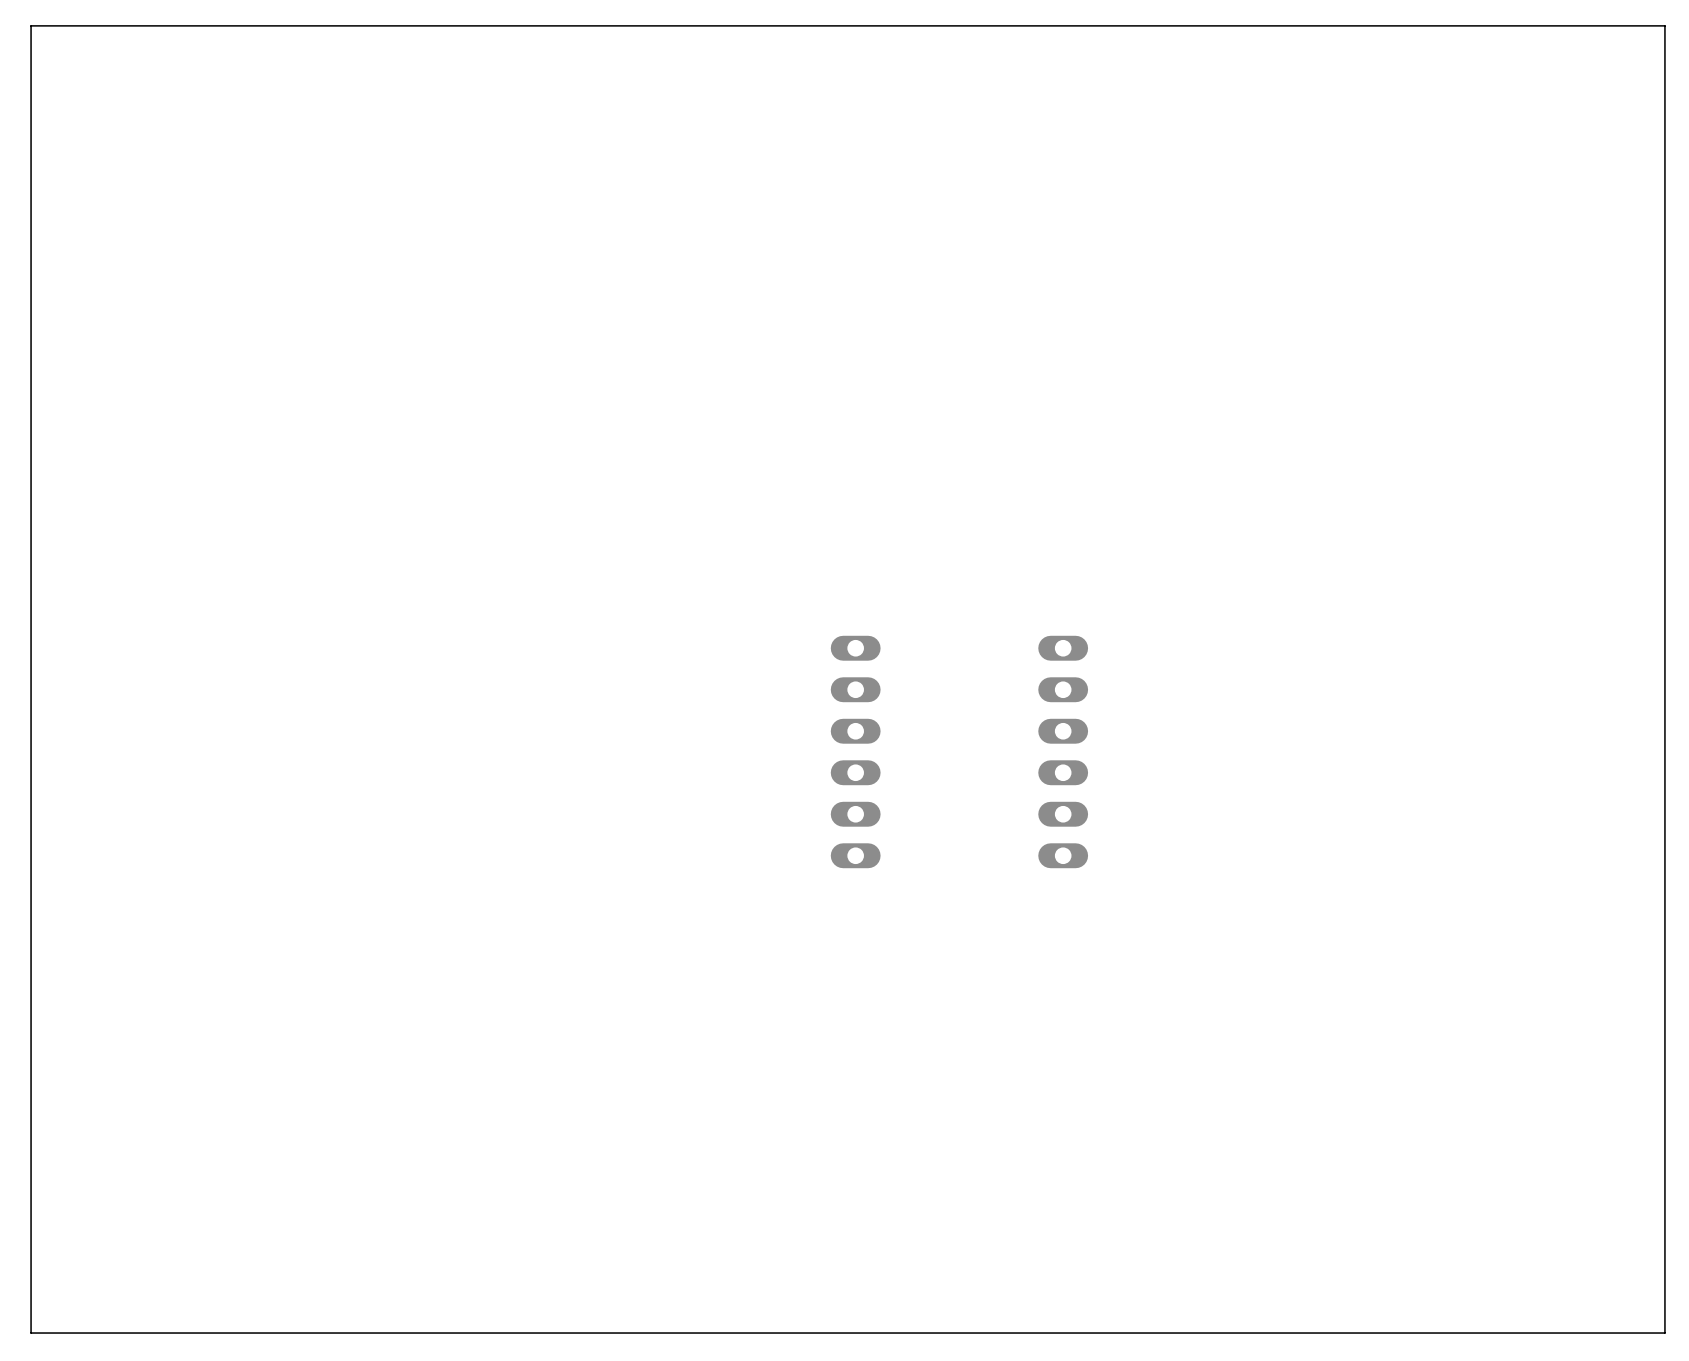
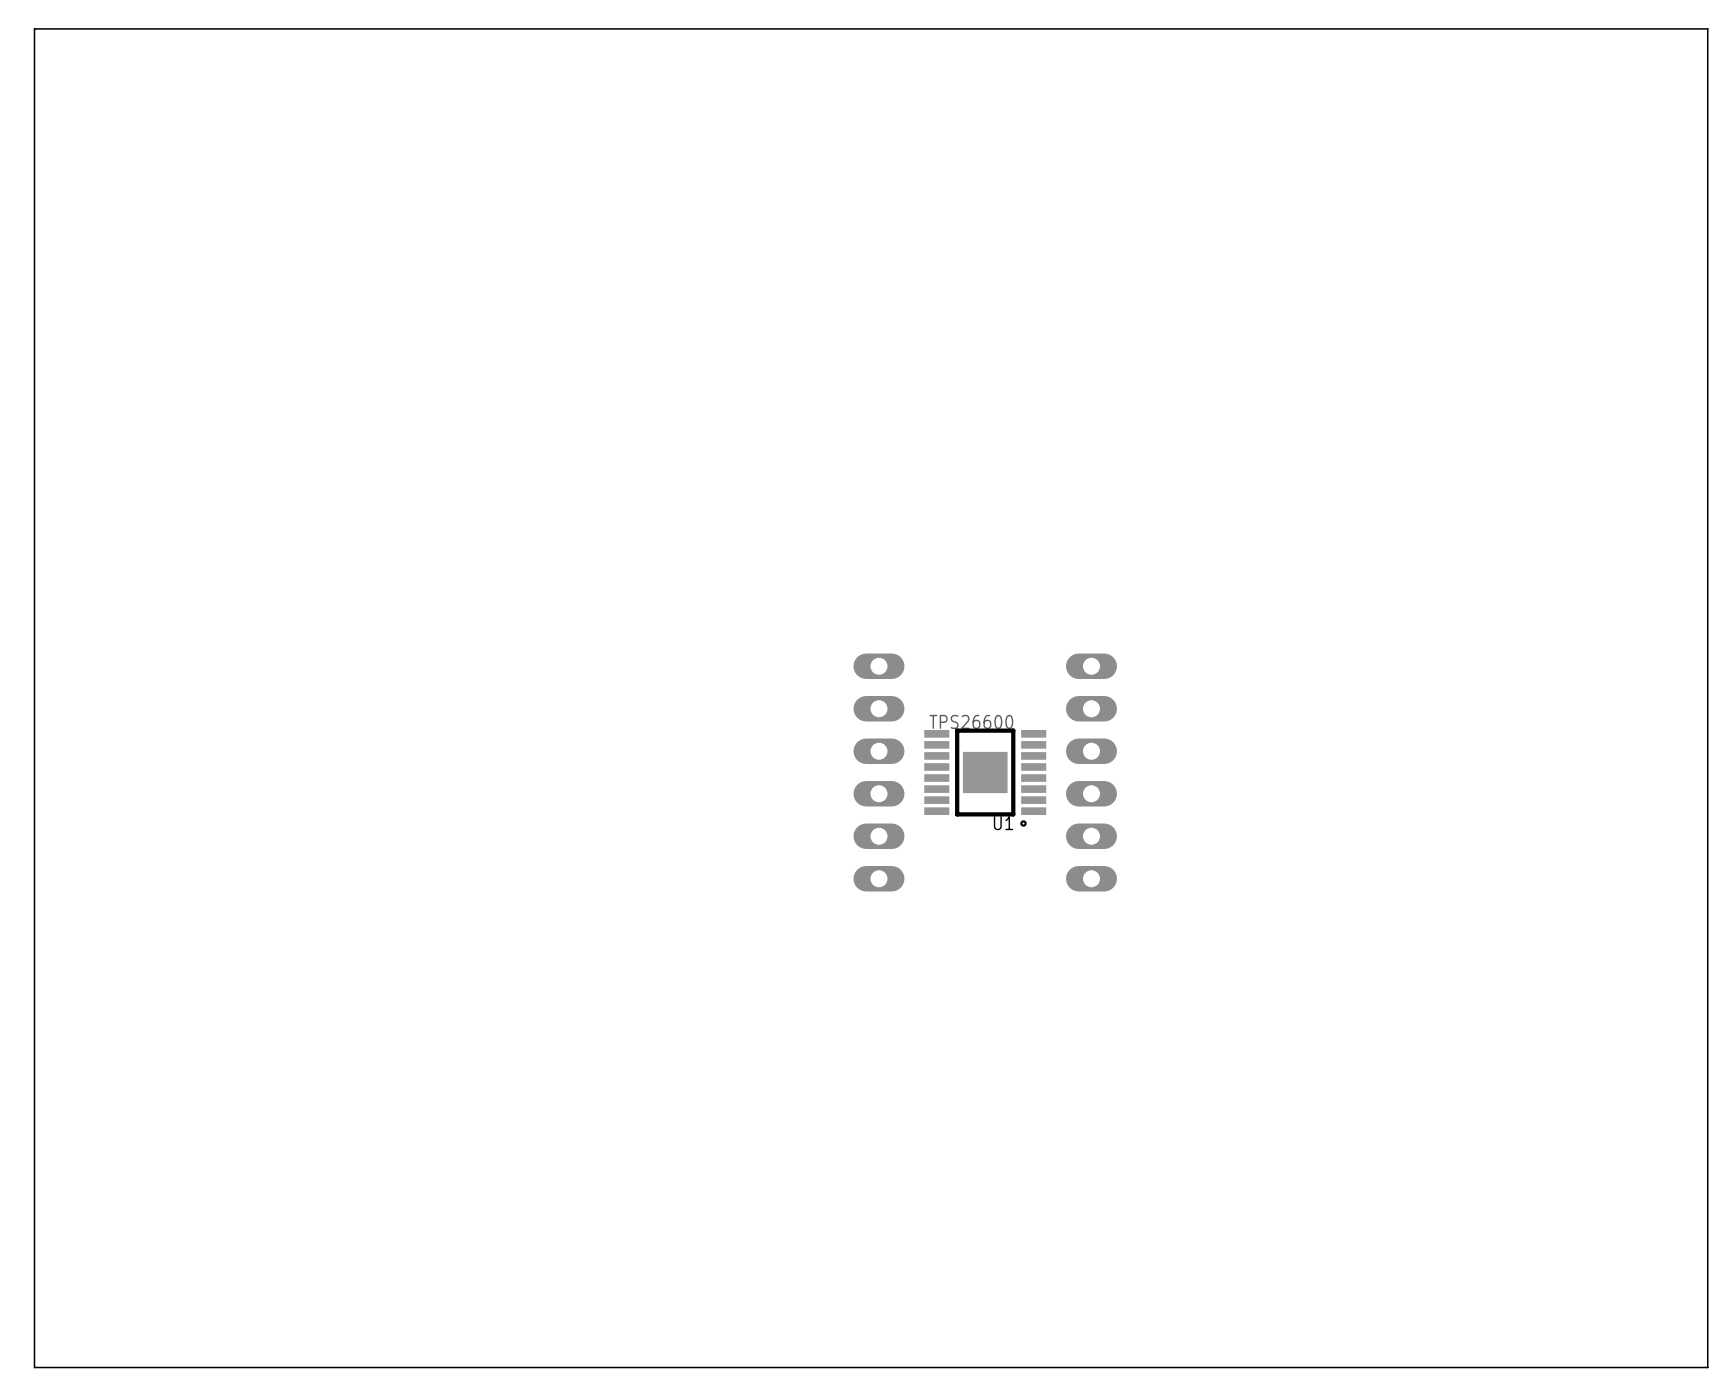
U1: none -> TPS26600 (985, 777)

